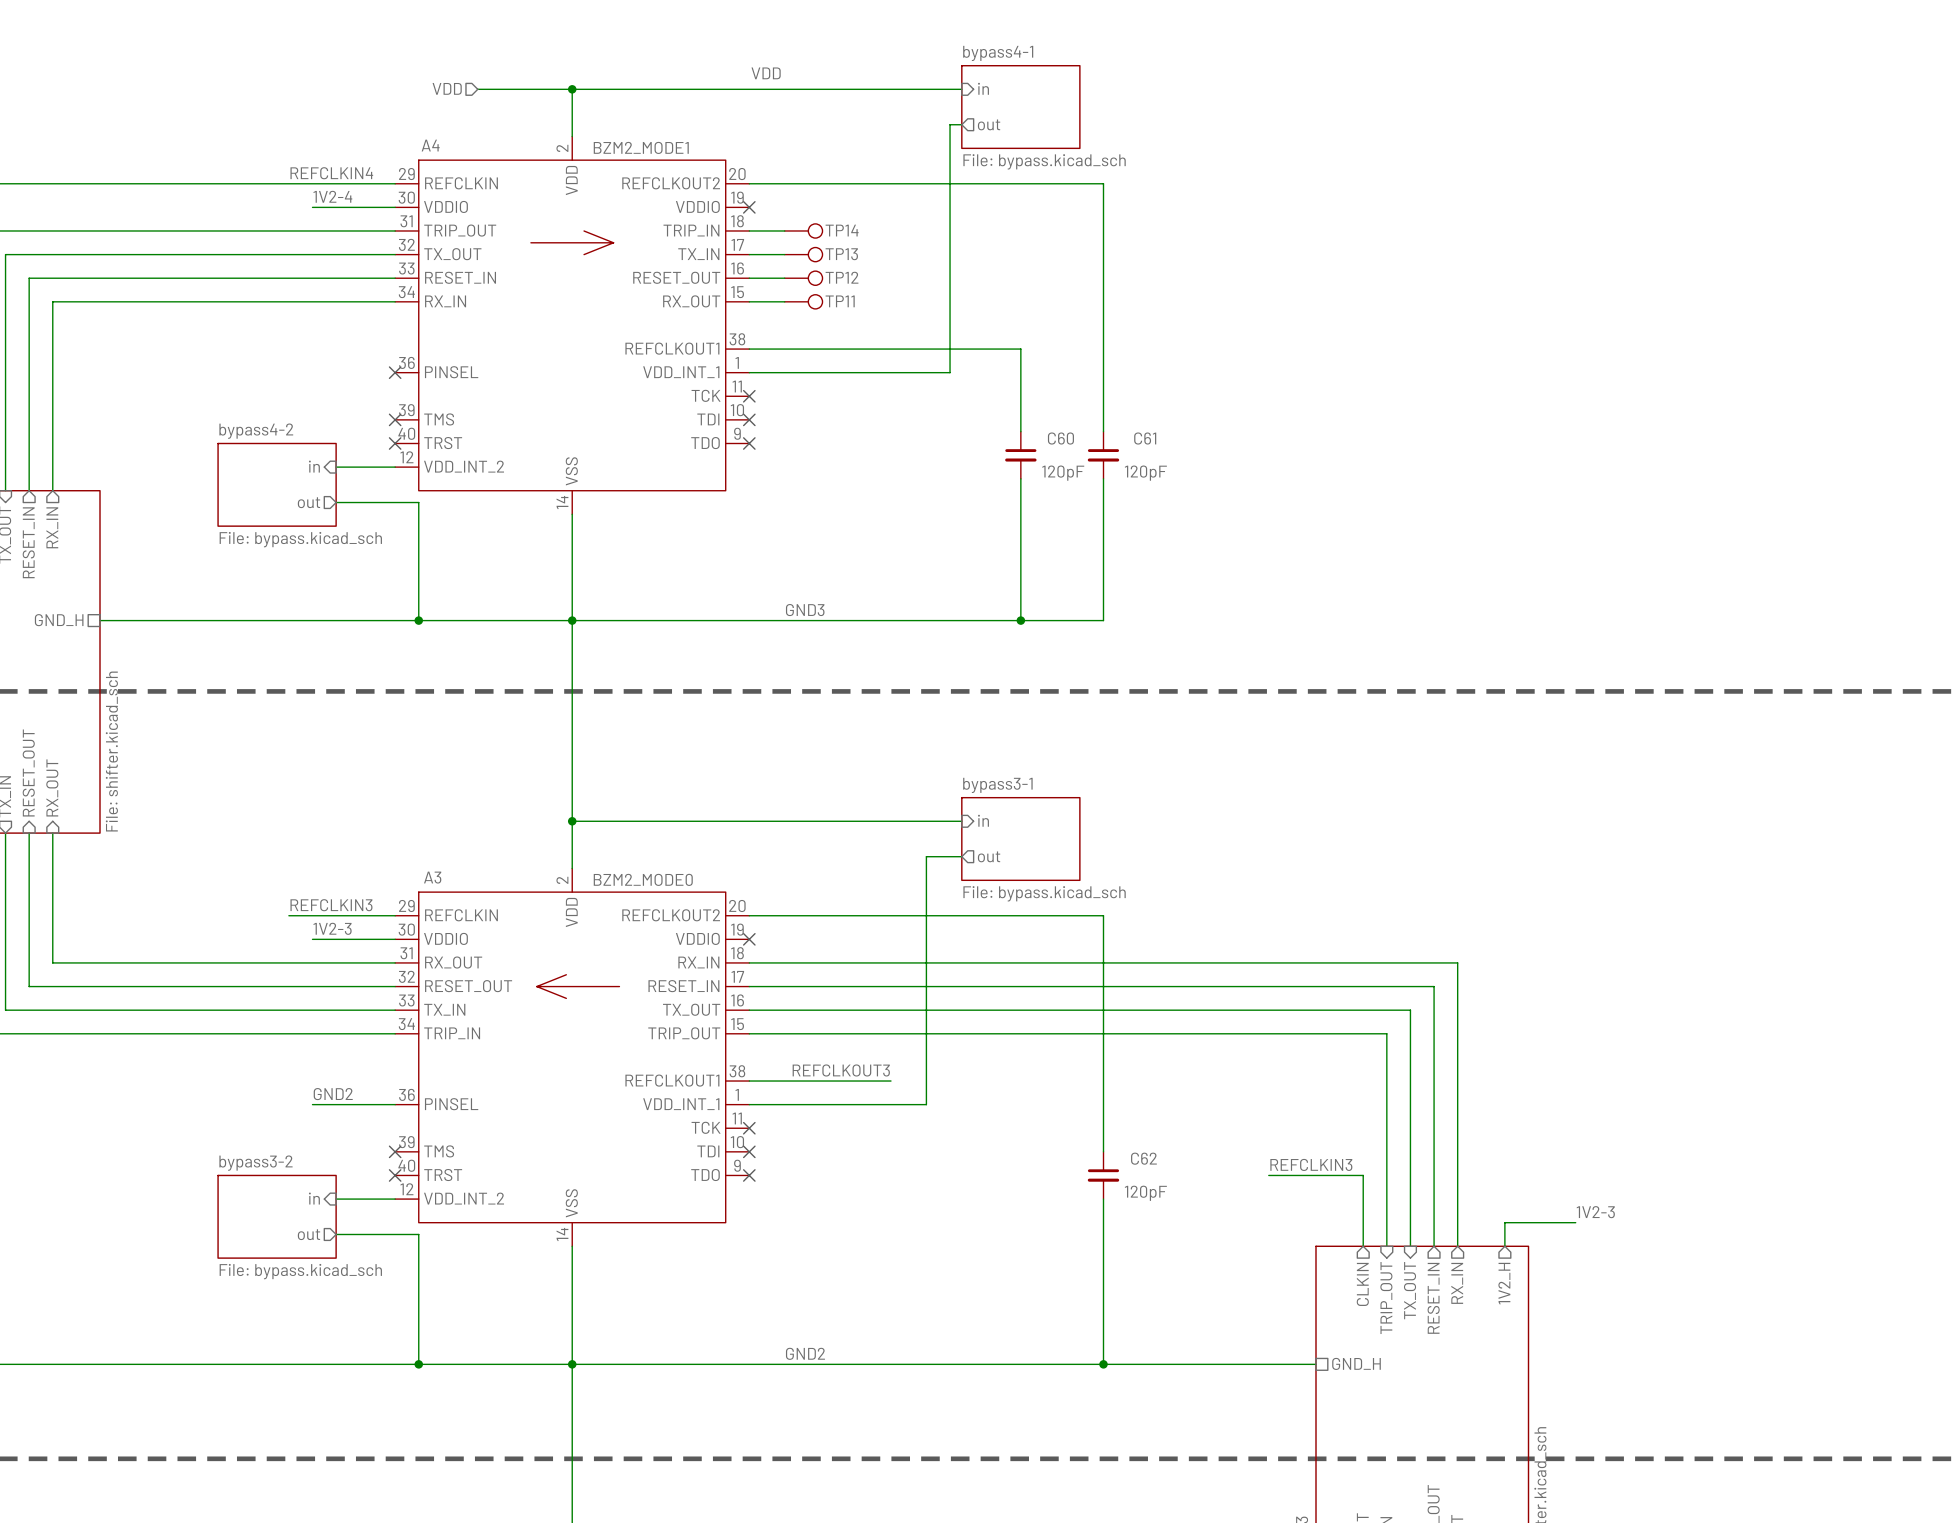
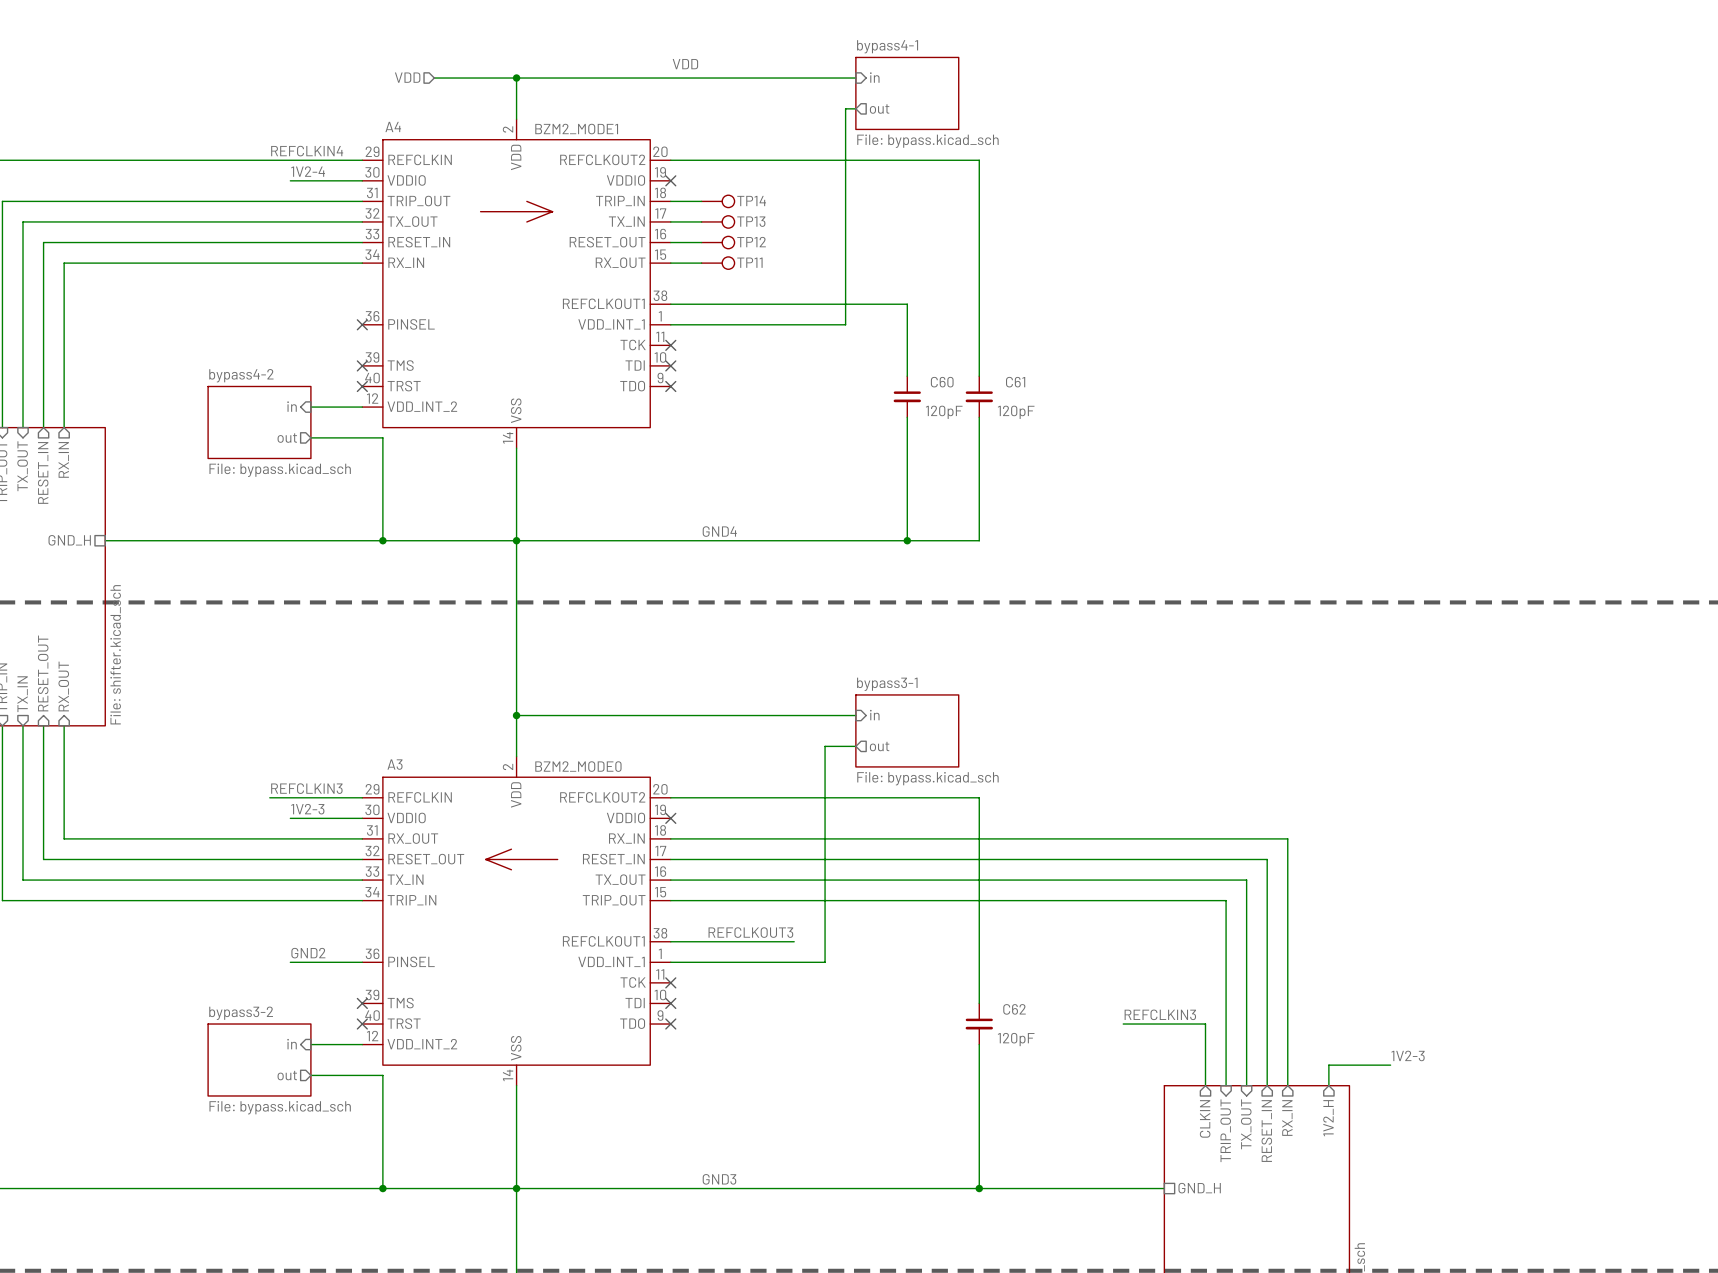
label: GND3 (805, 610) -> GND4 (719, 531)
label: GND2 (805, 1353) -> GND3 (719, 1179)

